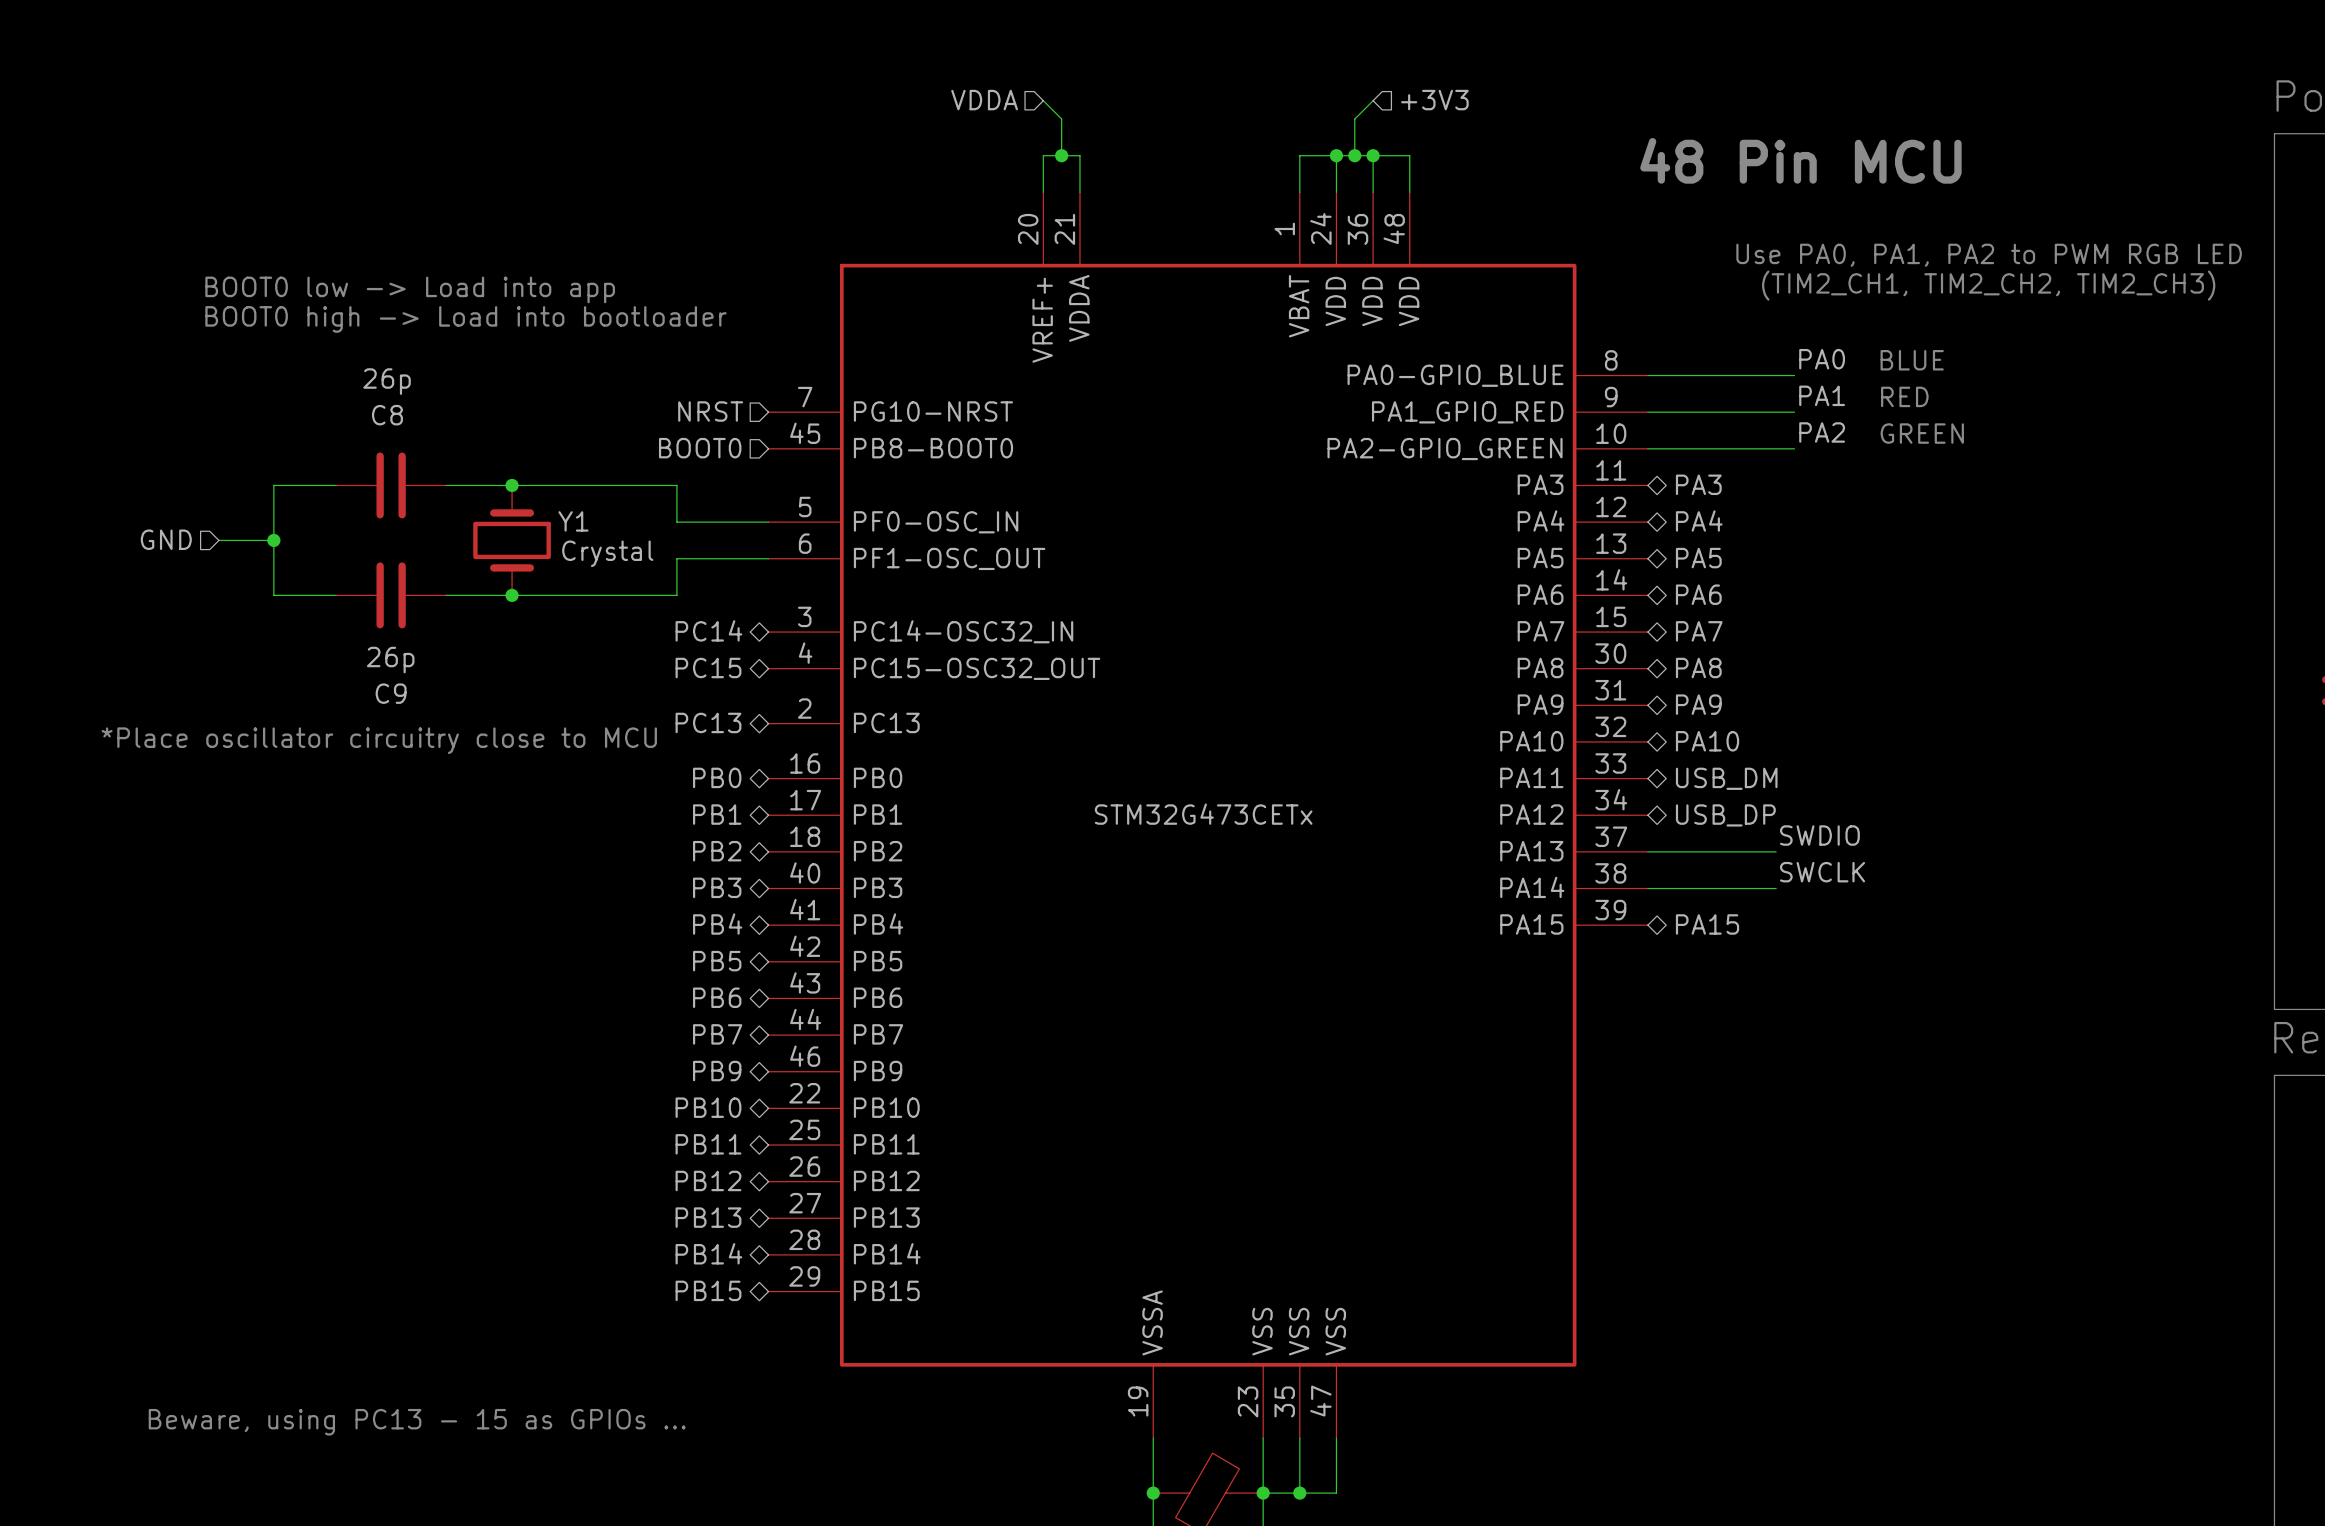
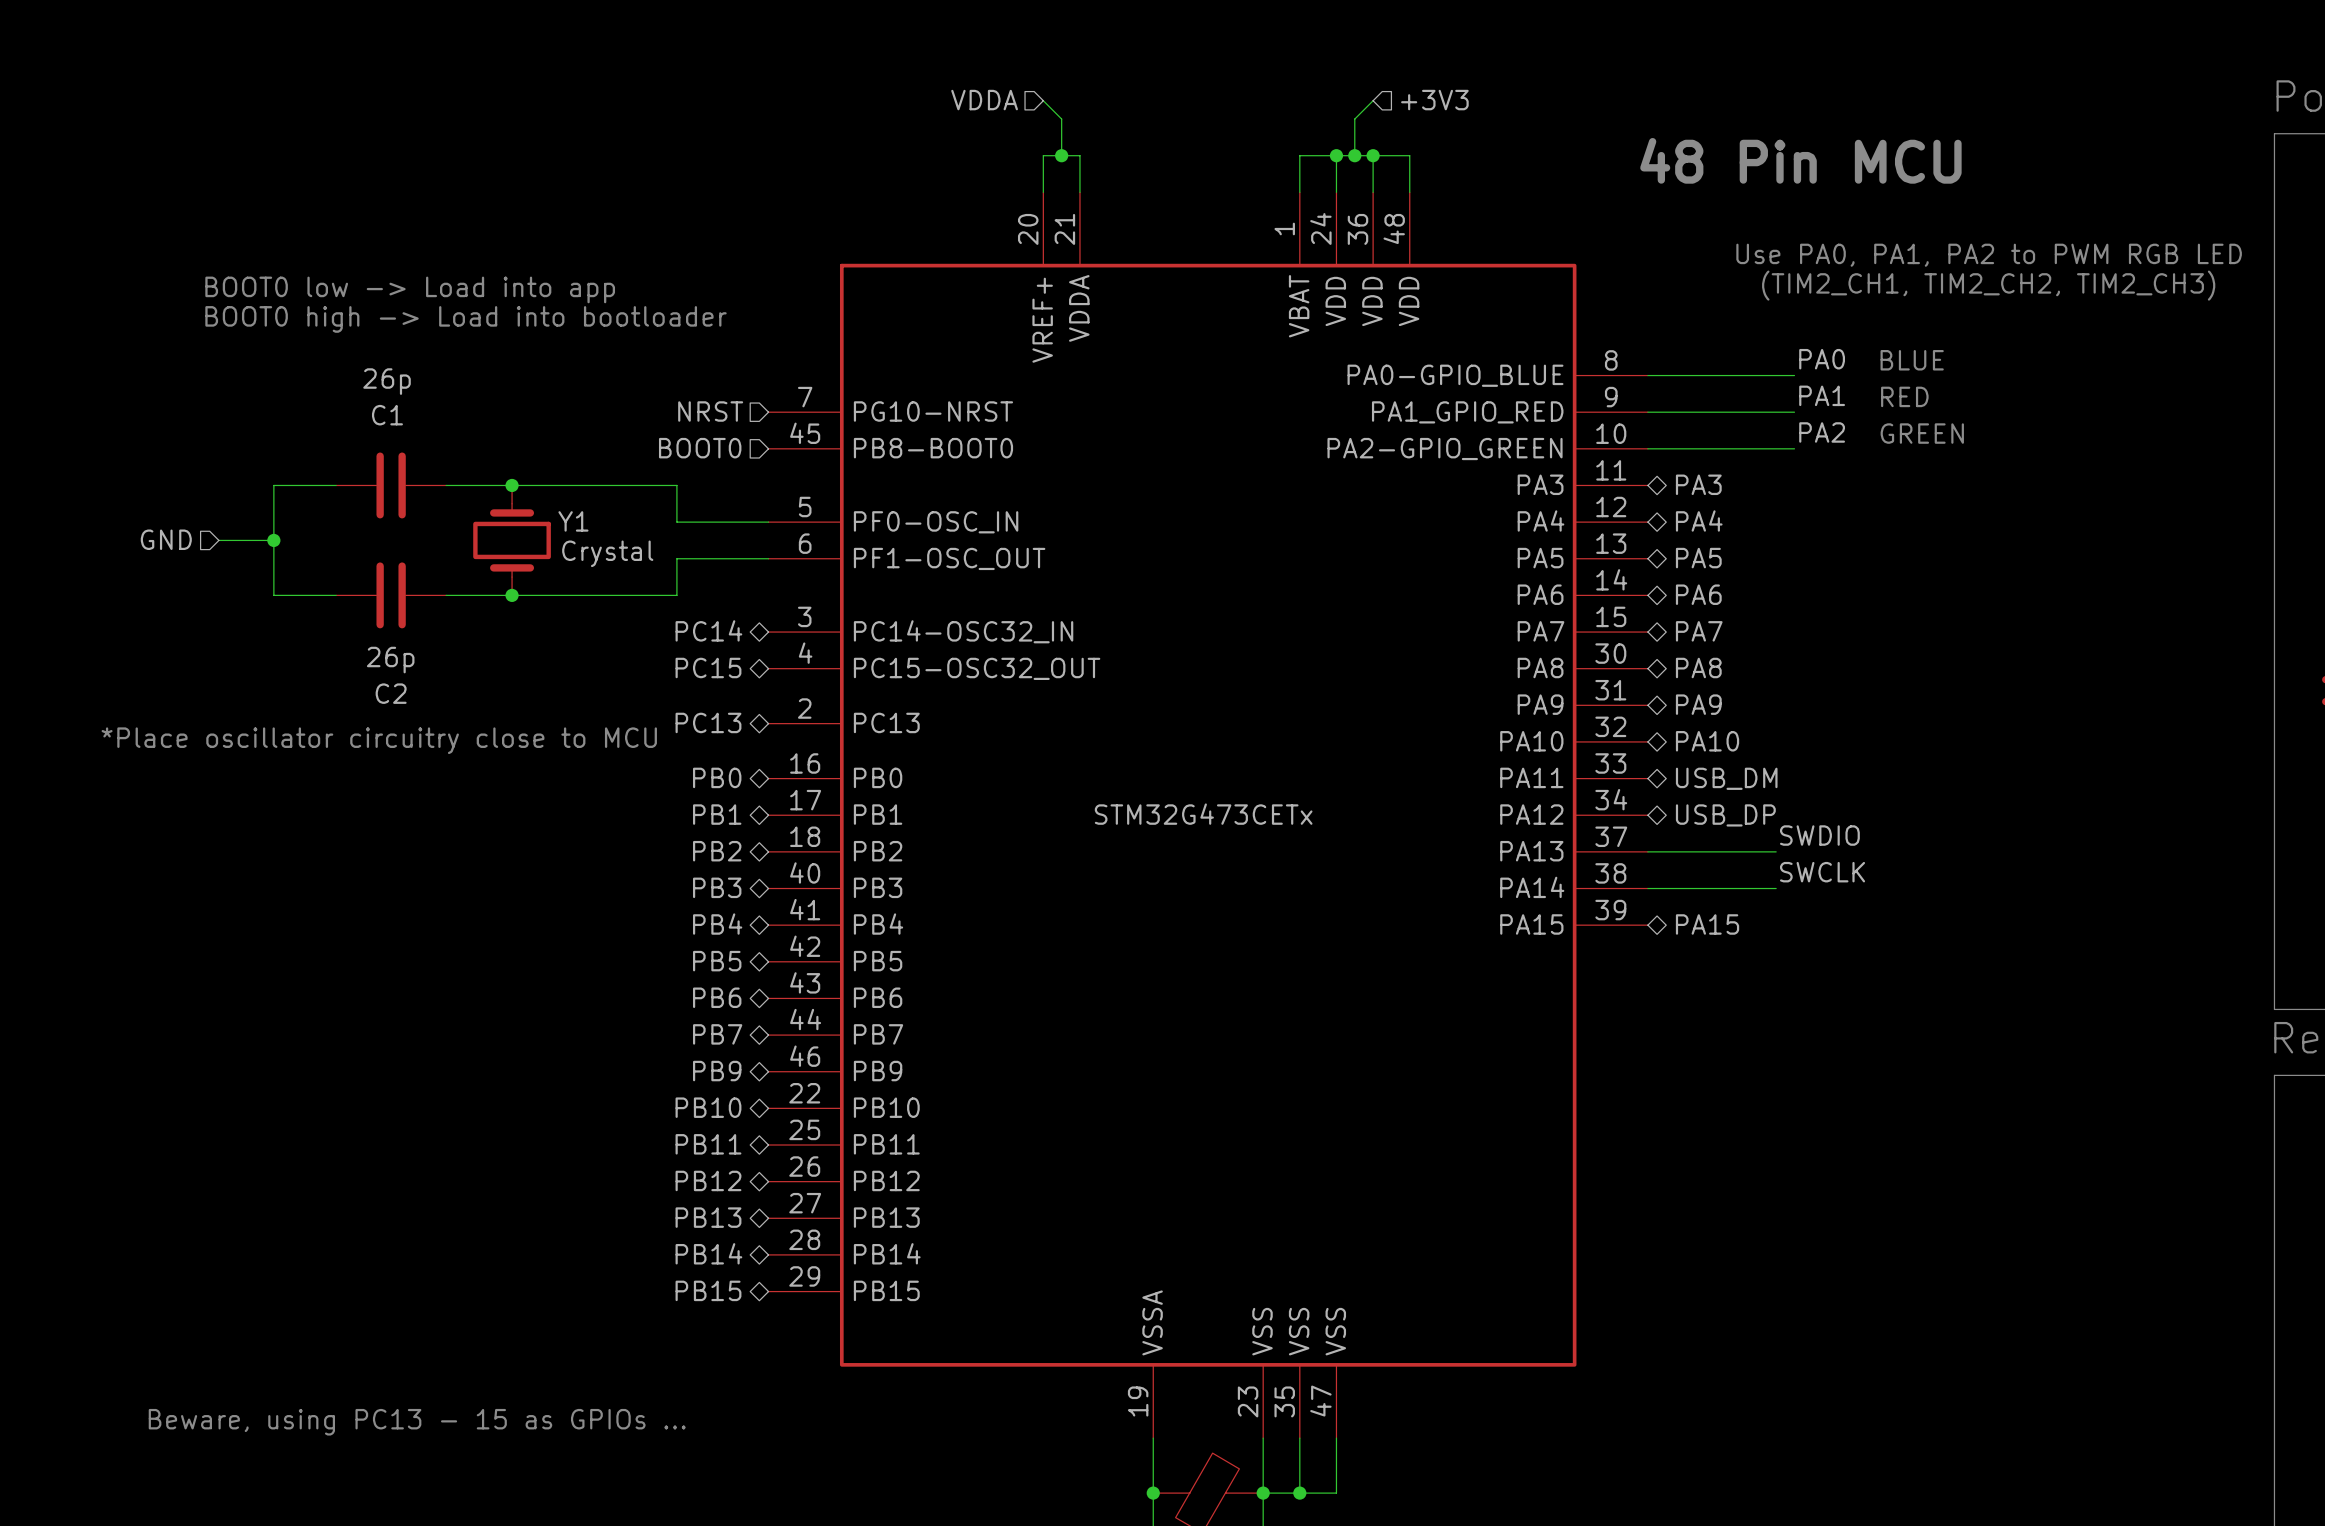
C8 name: C8 (387, 415) -> C1 (387, 415)
C9 name: C9 (391, 693) -> C2 (391, 693)

